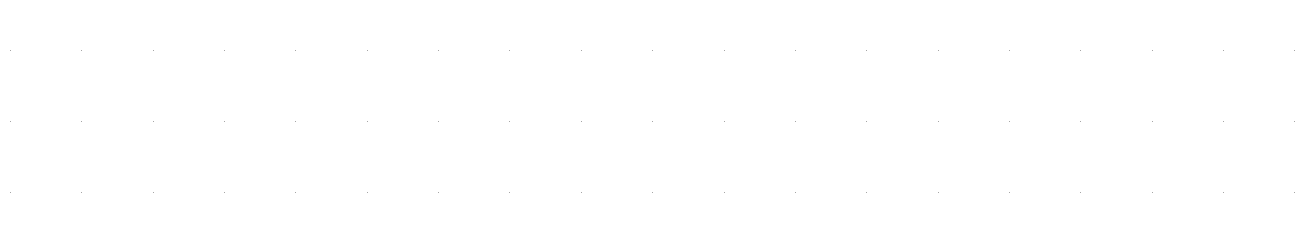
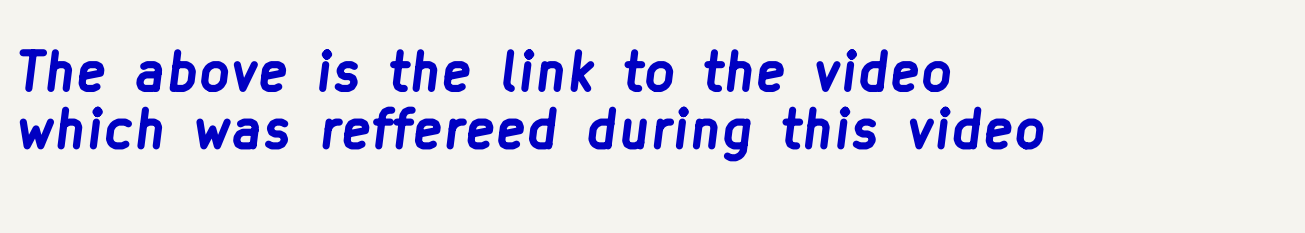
text: none -> The above is the link to the video (484, 70)
text: none -> which was reffereed during this video (531, 133)

